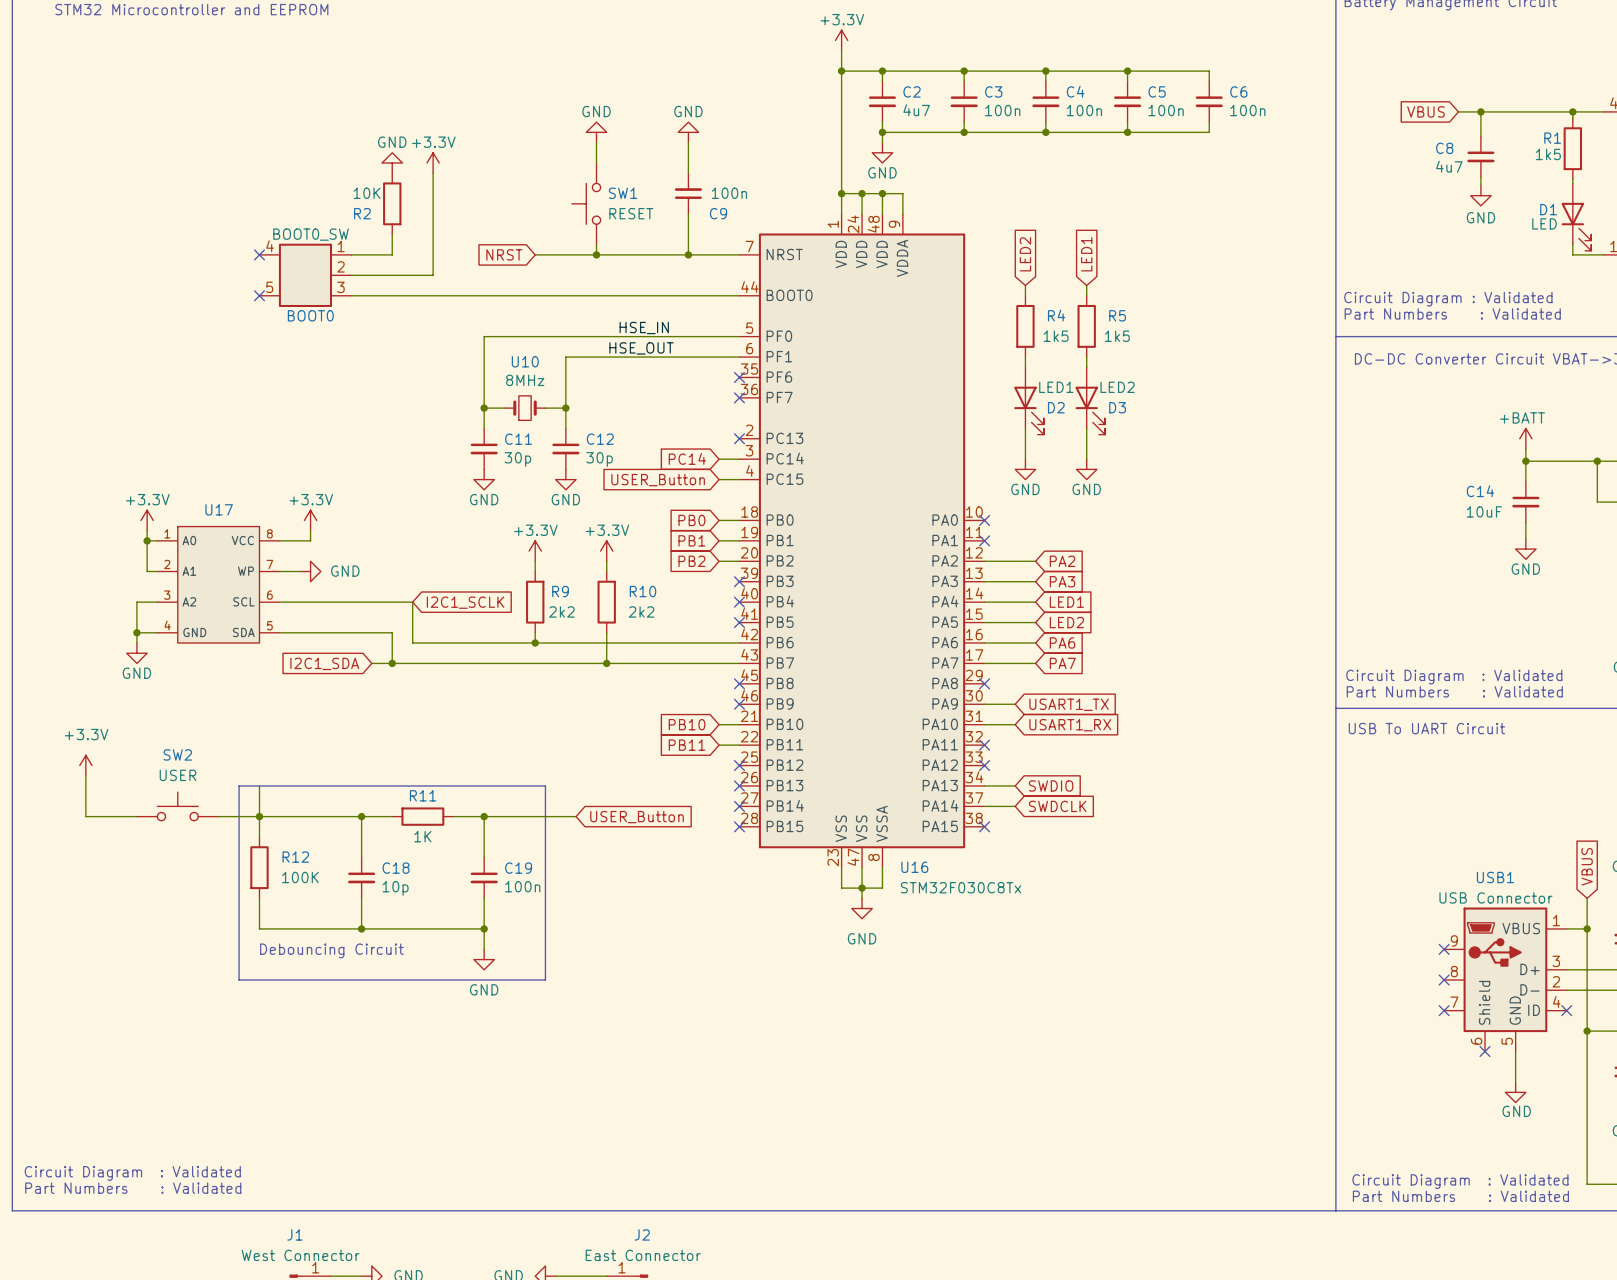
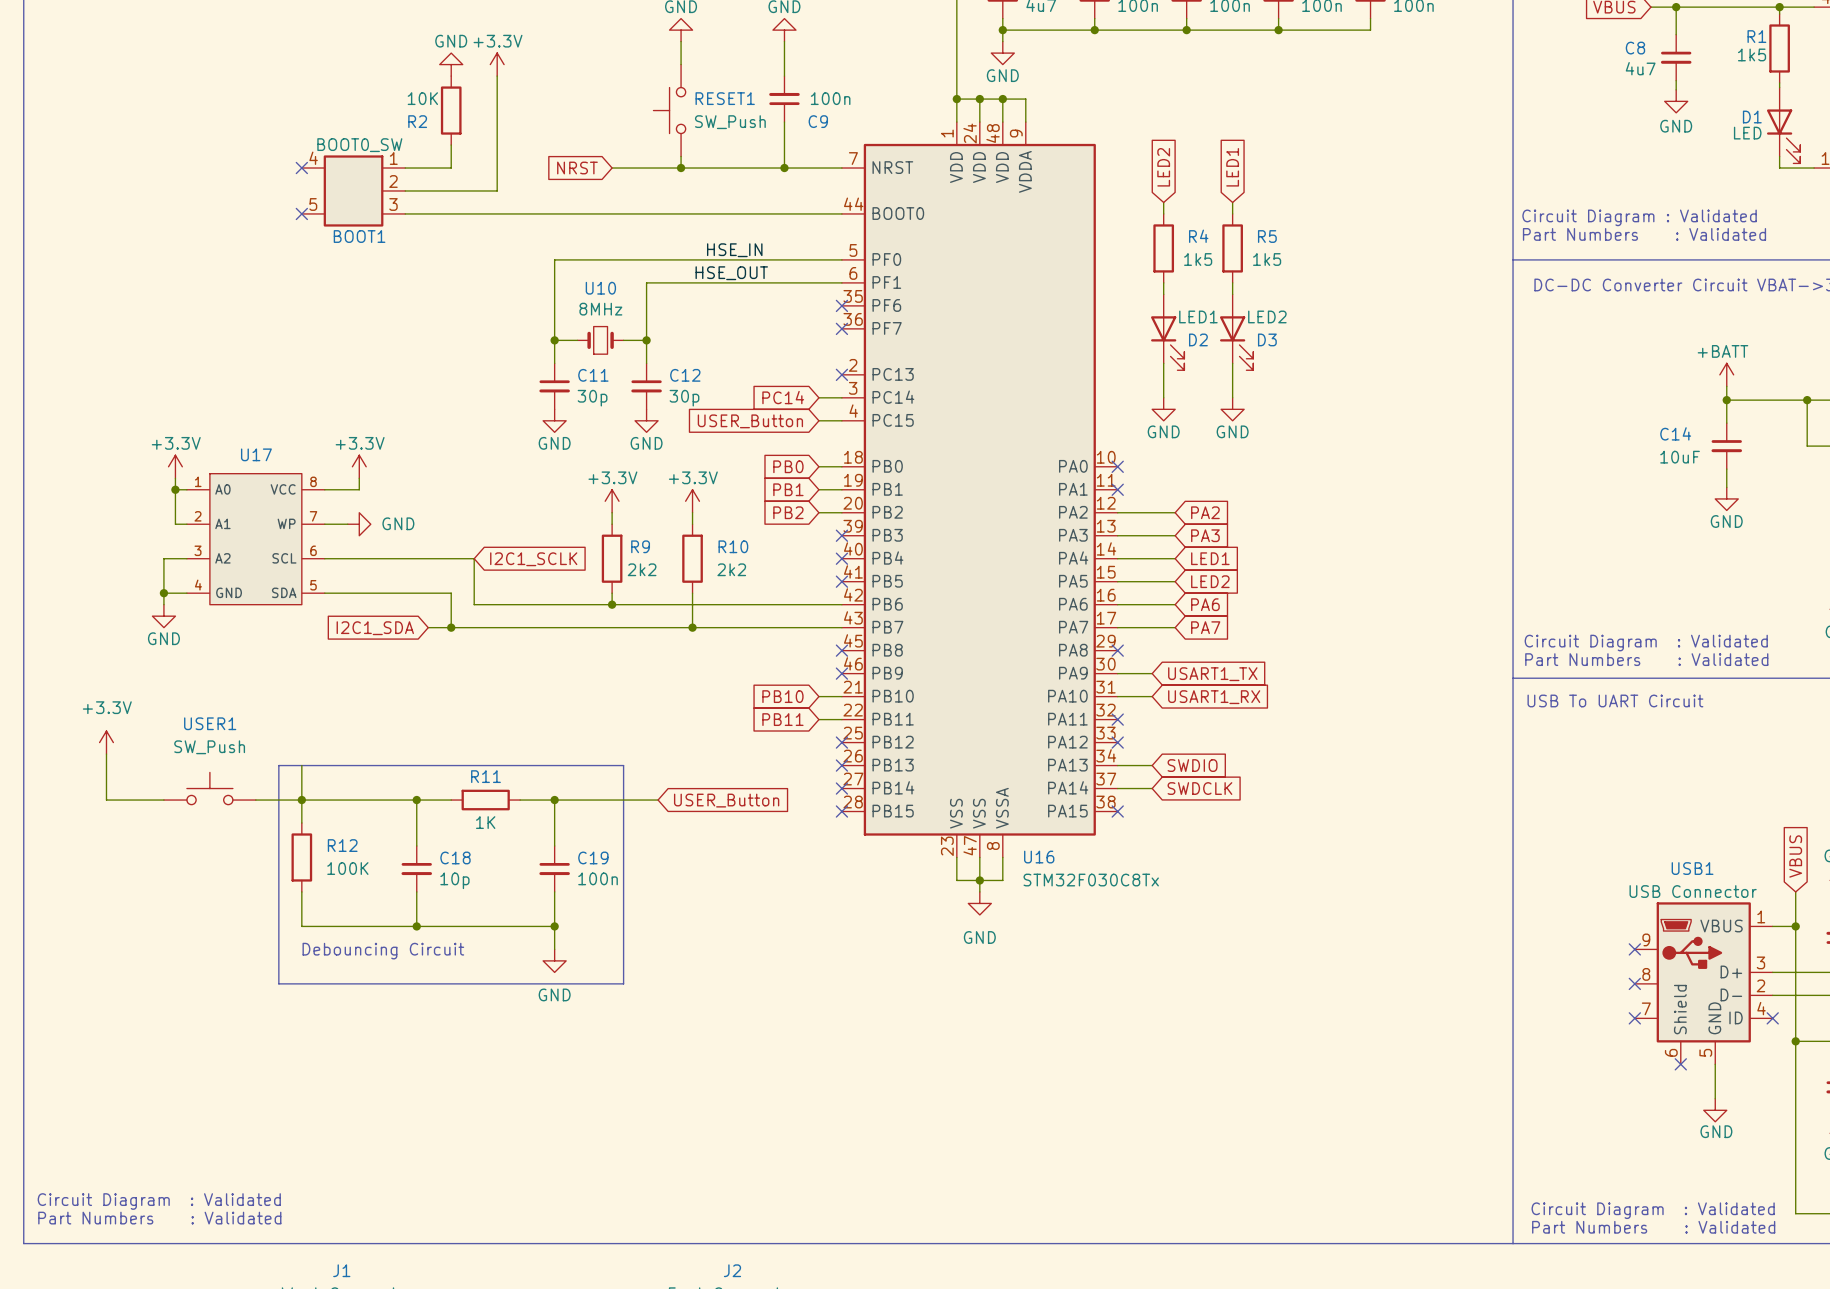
SW1 name: SW1 (623, 193) -> RESET1 (725, 98)
SW1 value: RESET (631, 213) -> SW_Push (730, 122)
BOOT0 name: BOOT0 (310, 315) -> BOOT1 (359, 236)
SW2 name: SW2 (177, 754) -> USER1 (210, 723)
SW2 value: USER (178, 775) -> SW_Push (209, 747)

